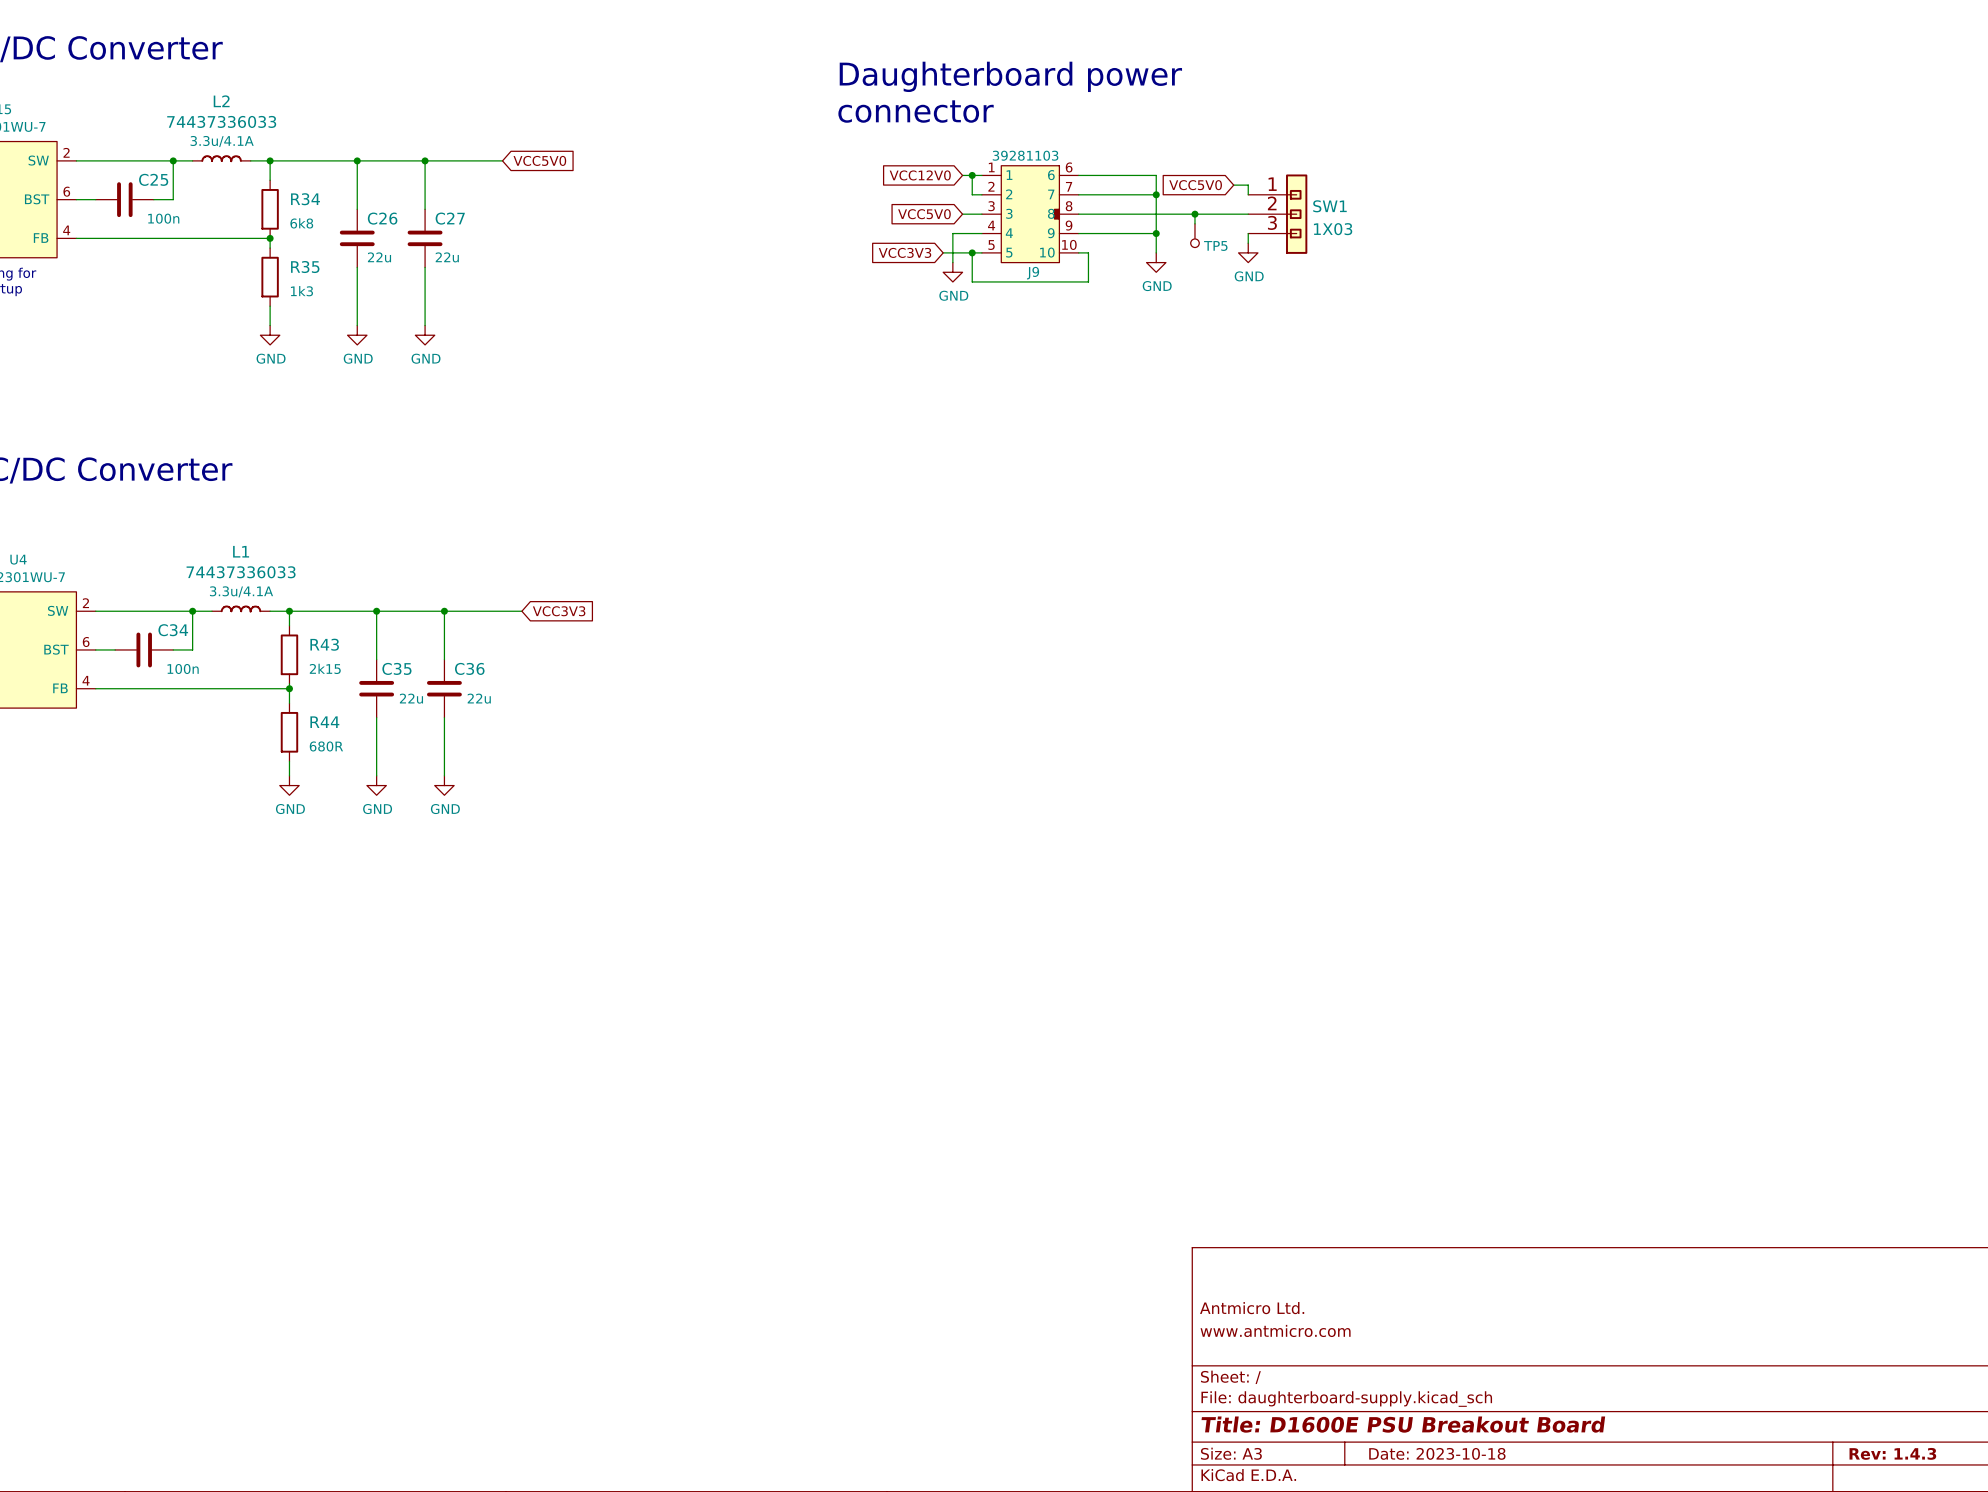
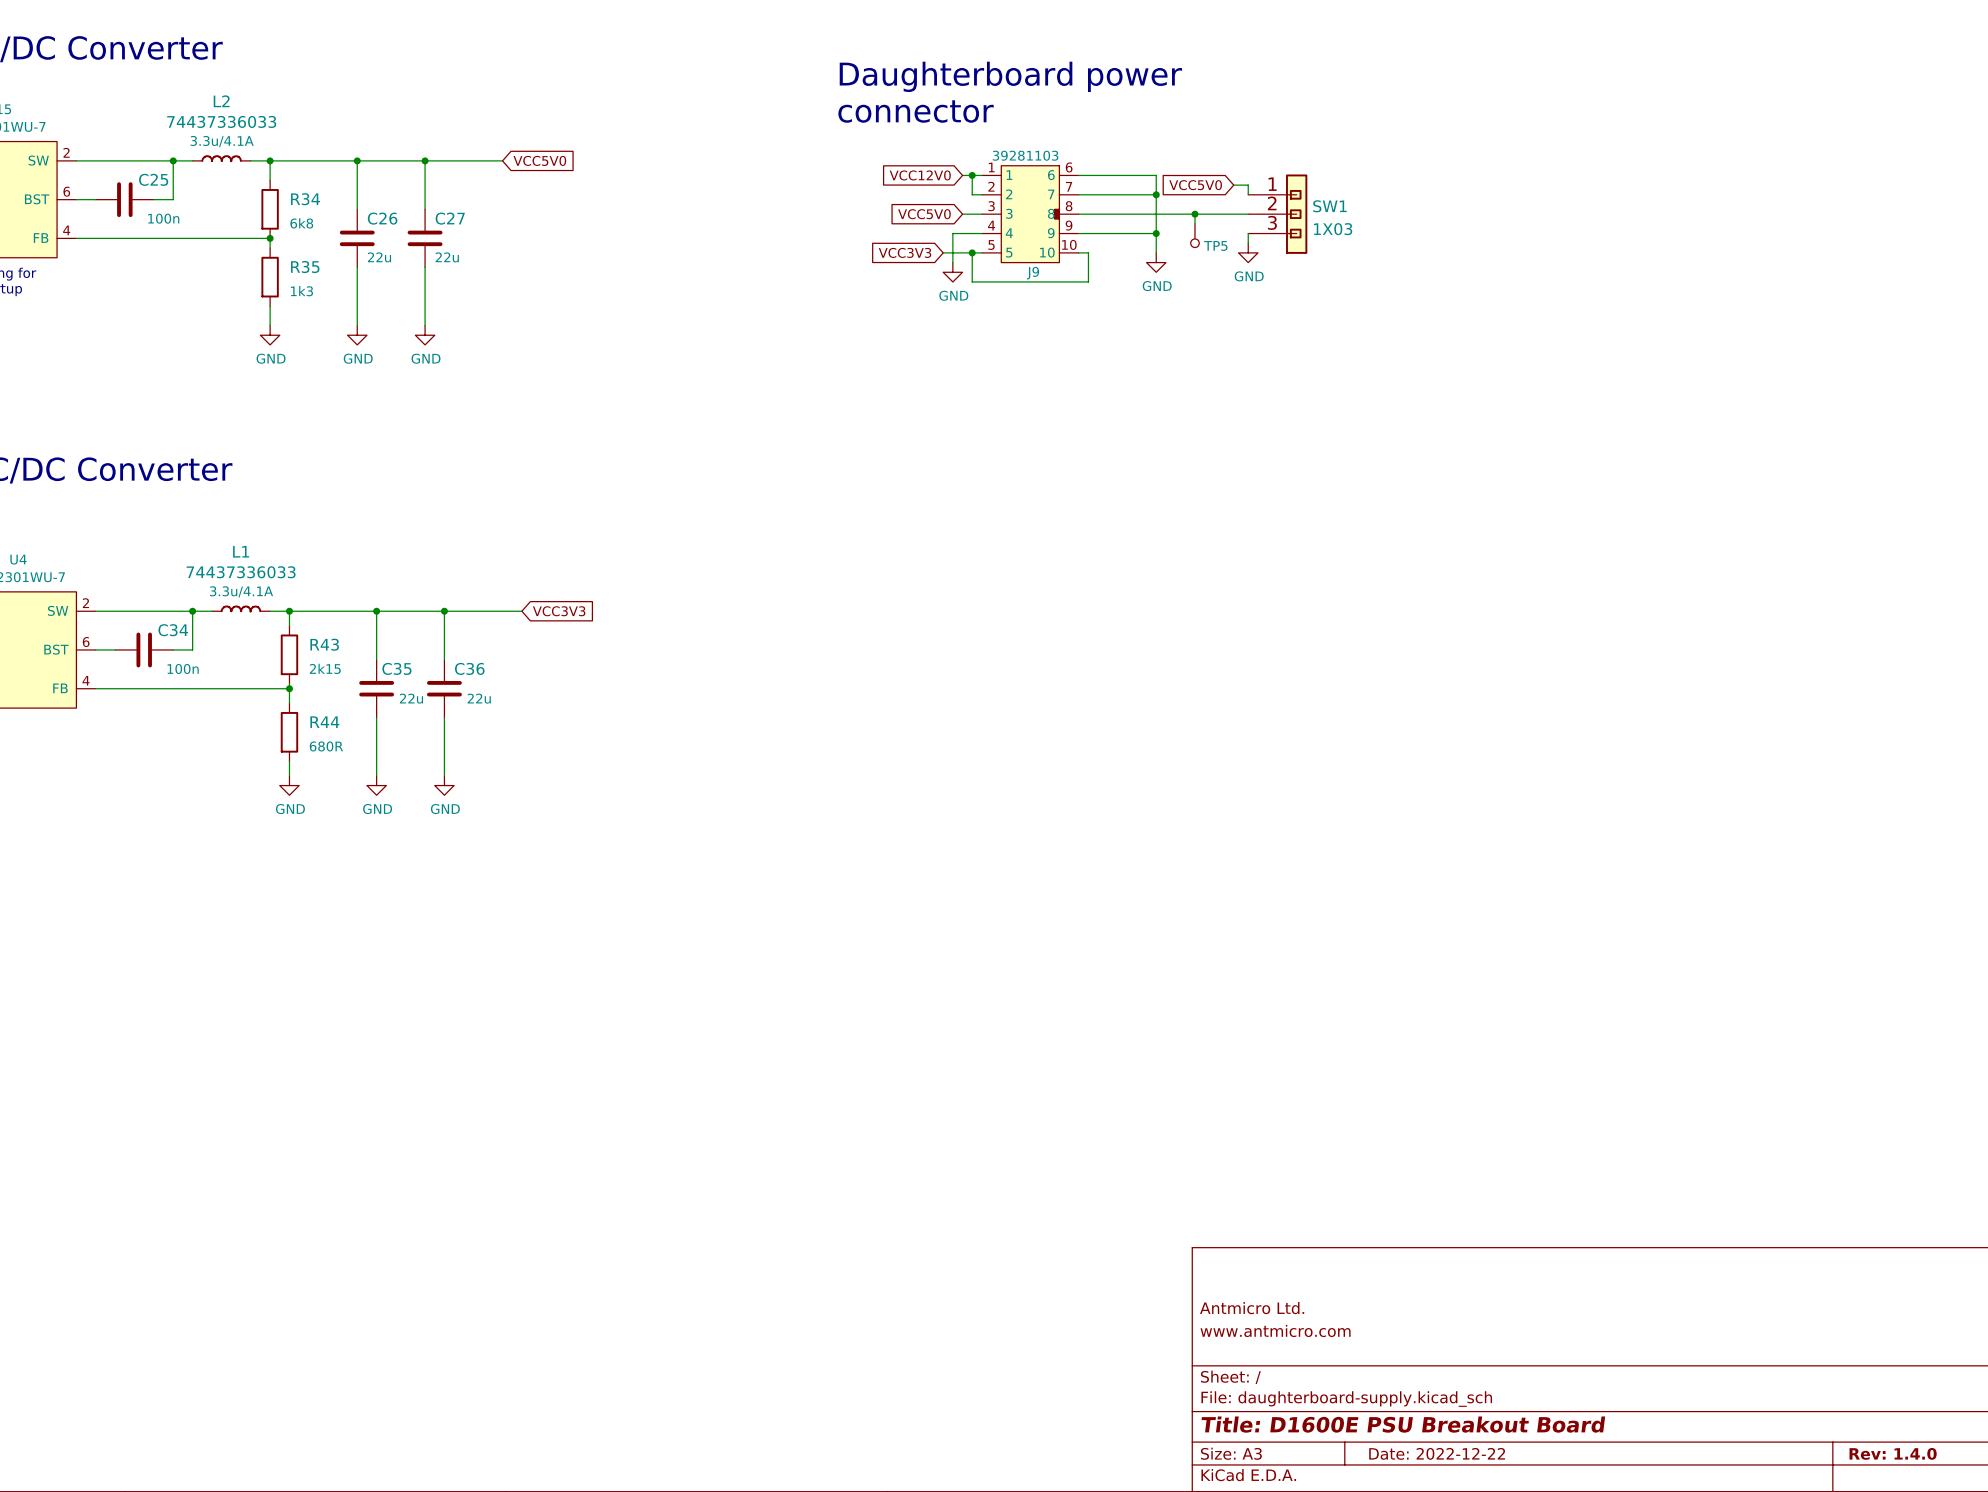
title block: Date: 2023-10-18 (1437, 1453) -> Date: 2022-12-22 (1437, 1453)
title block: Rev: 1.4.3 (1892, 1453) -> Rev: 1.4.0 (1893, 1453)

